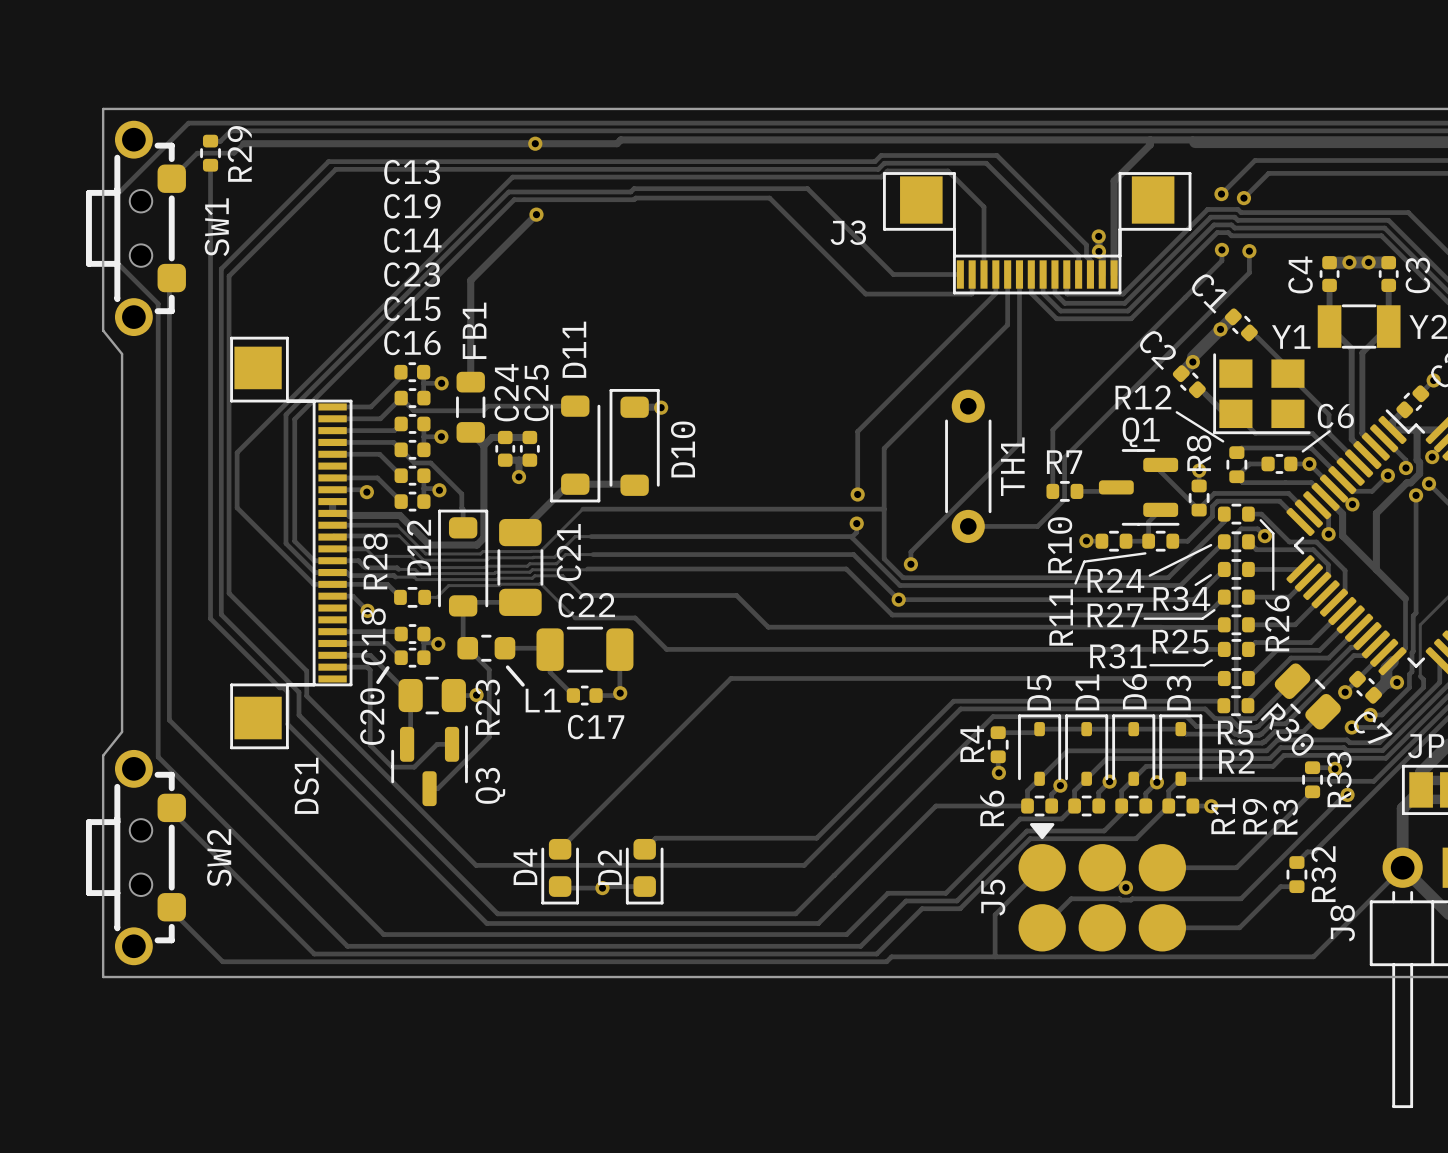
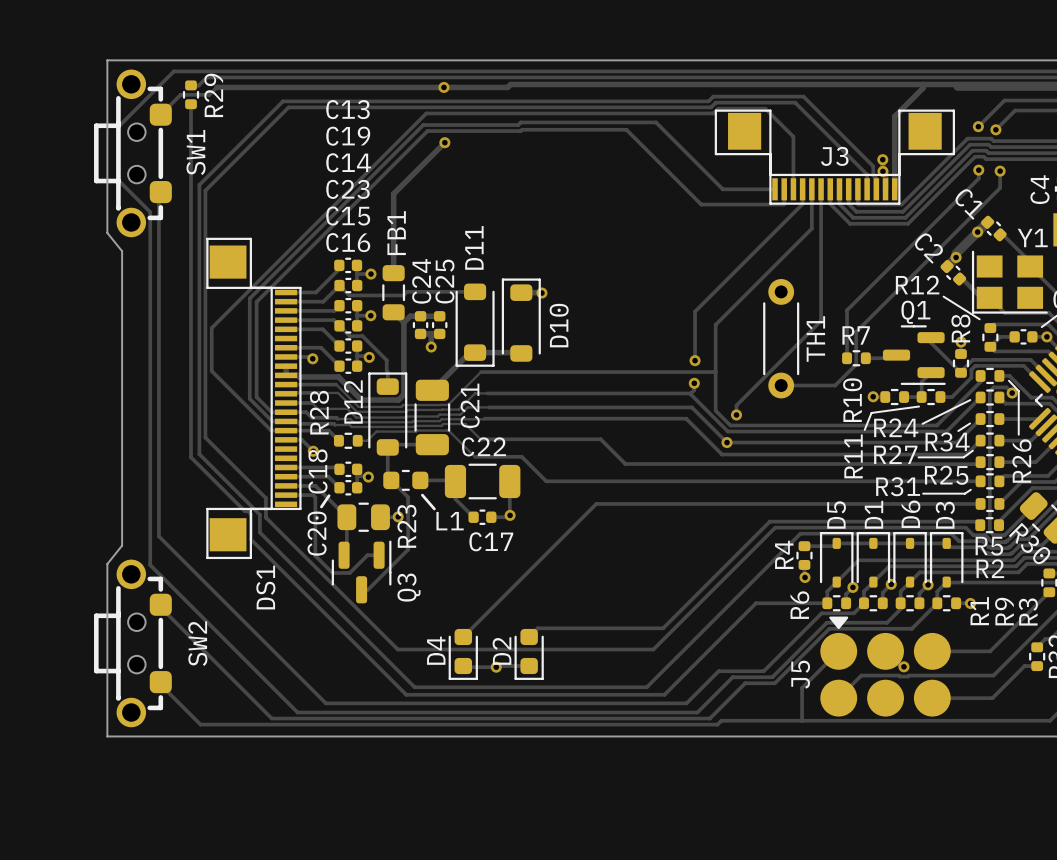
J3 name position: J3 (848, 232) -> J3 (834, 156)

